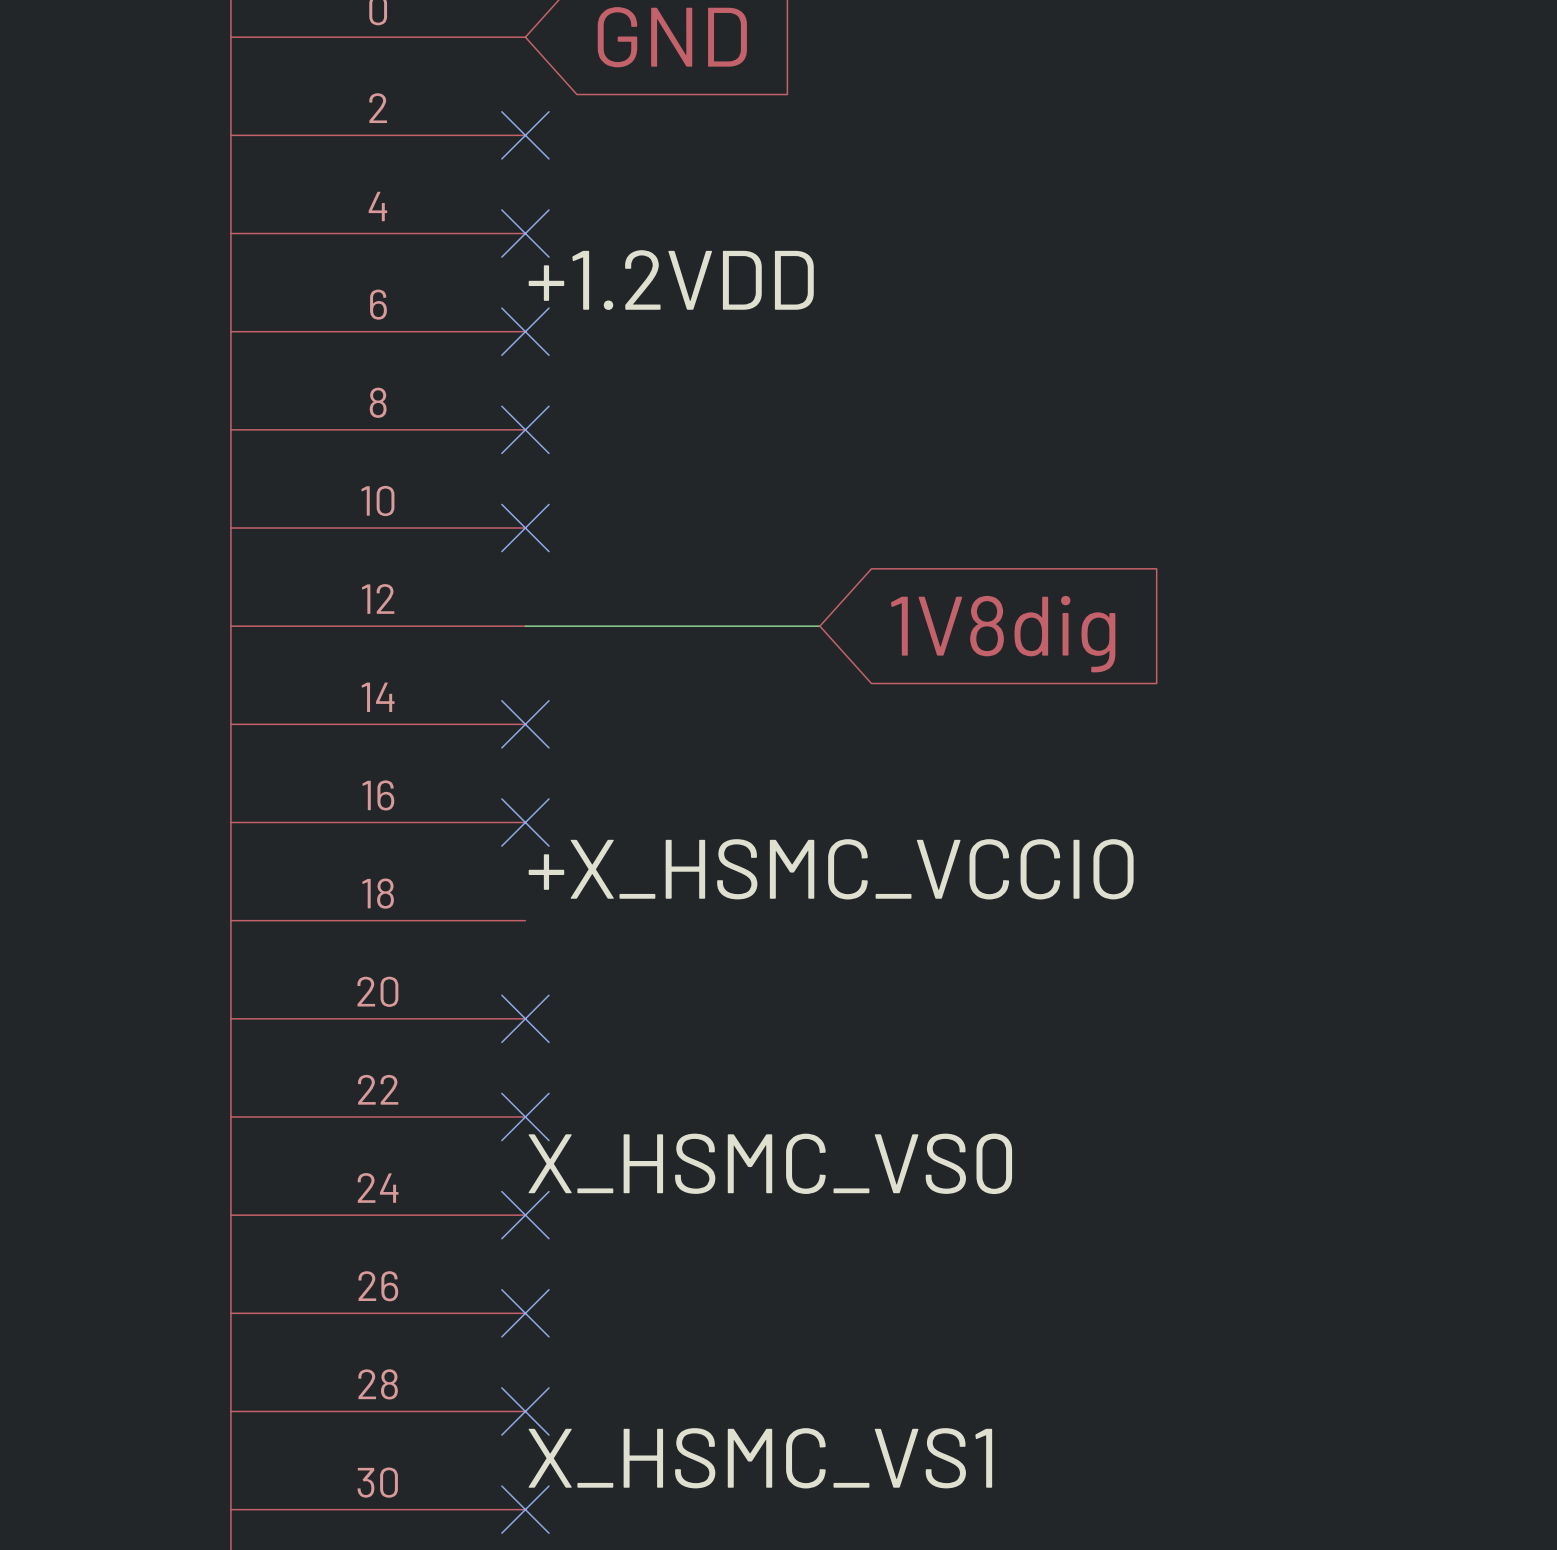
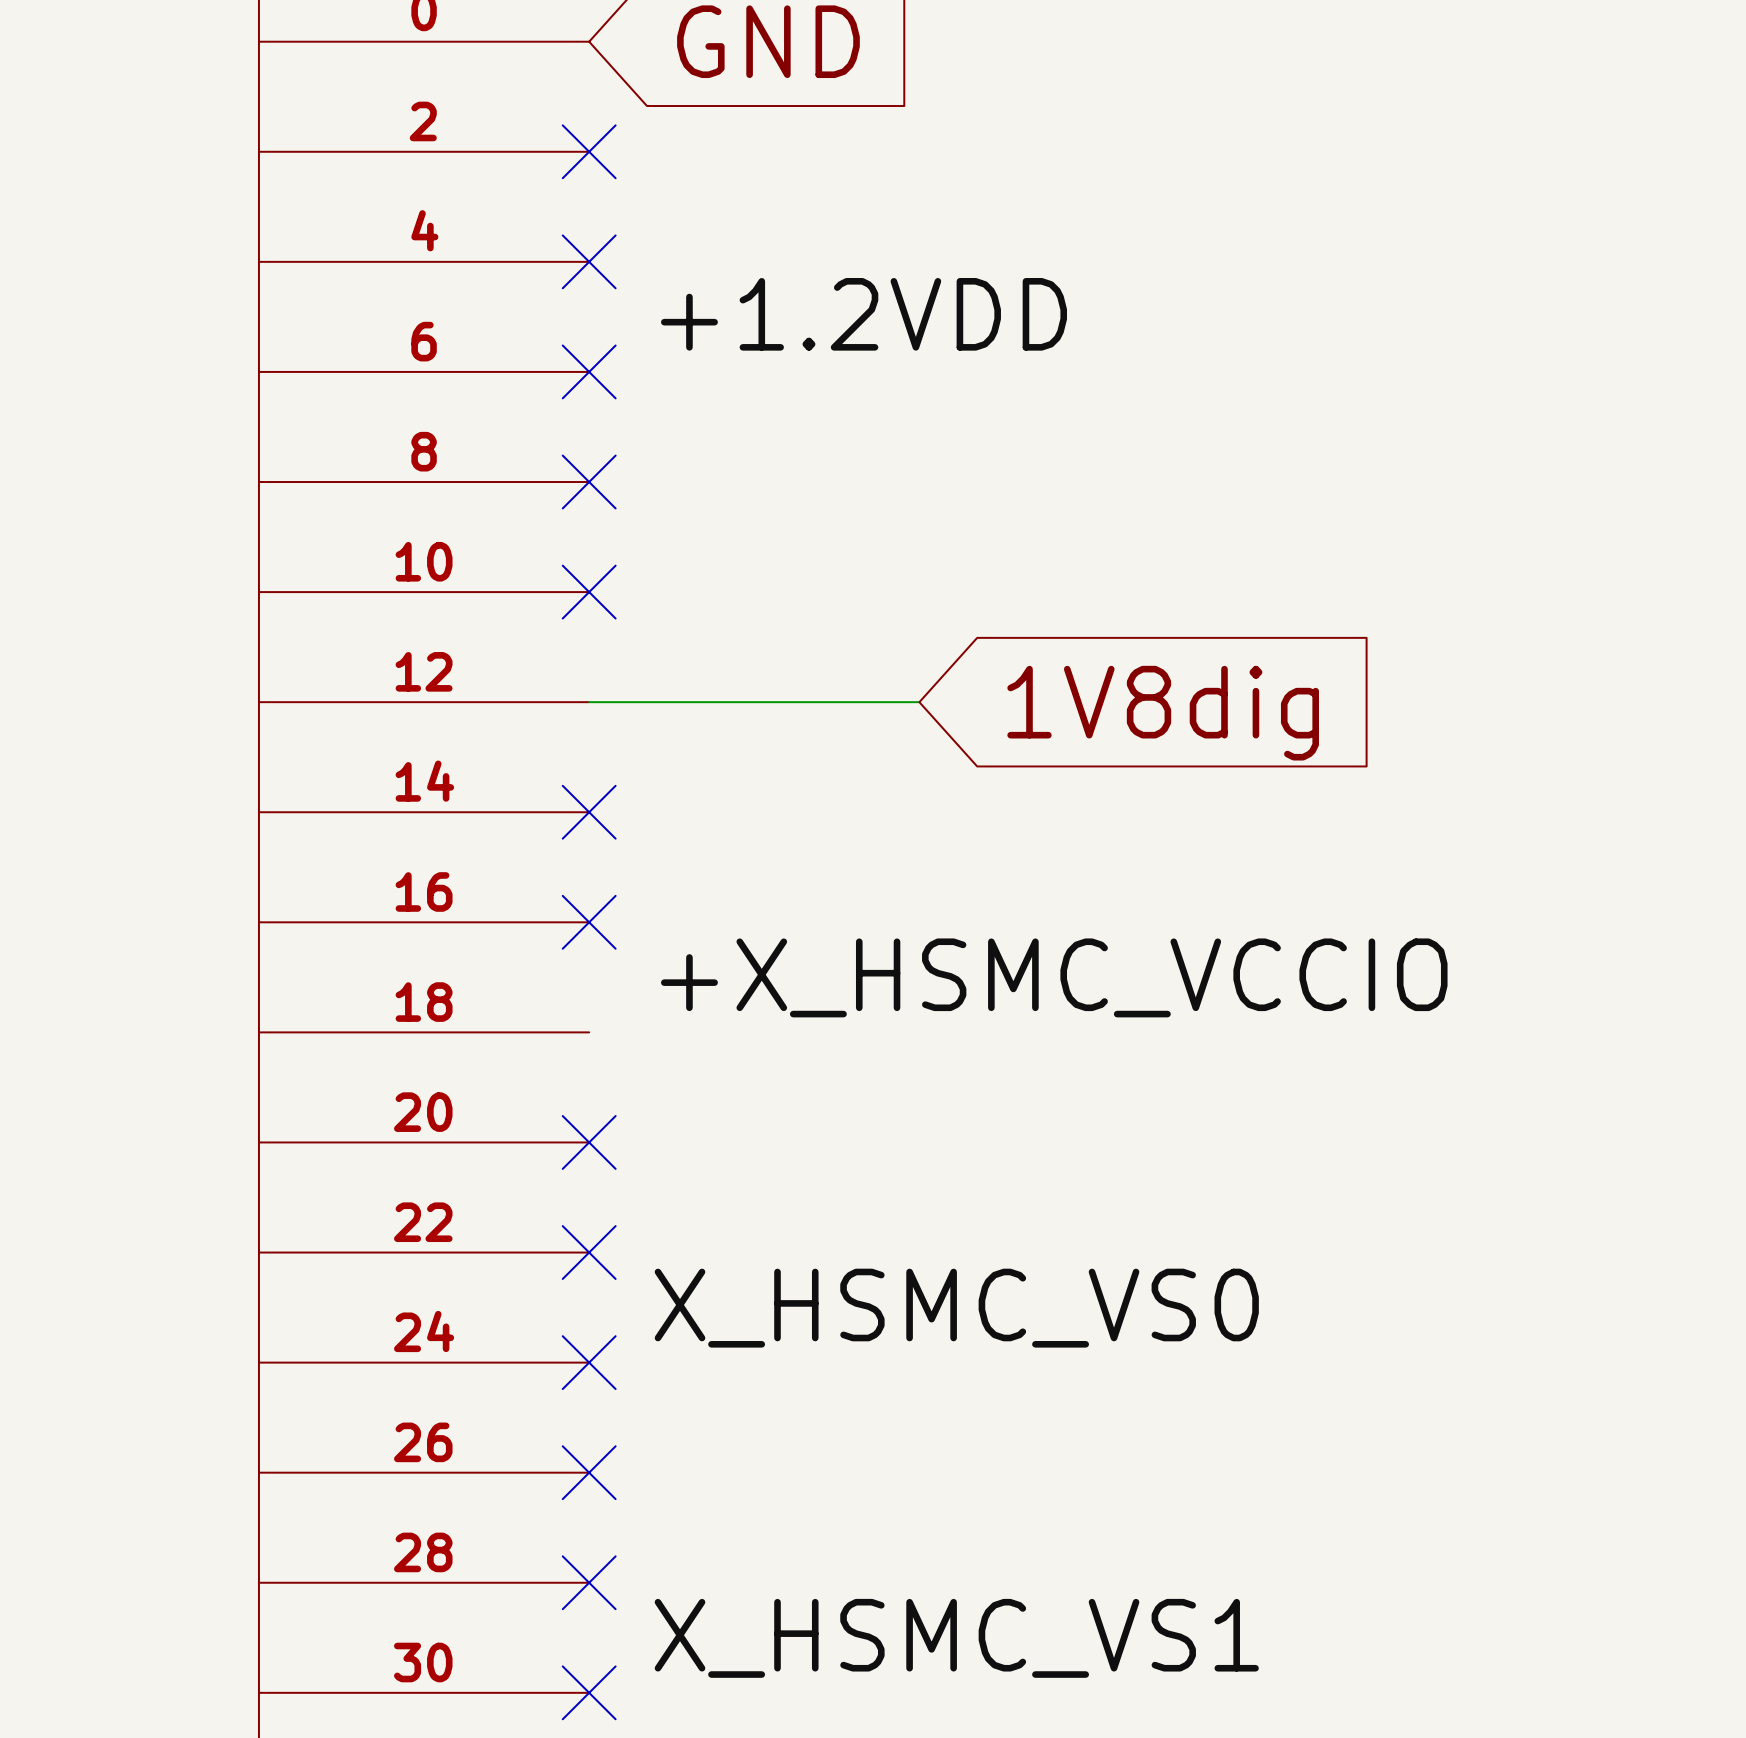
label position: +1.2VDD (671, 280) -> +1.2VDD (863, 314)
label position: +X_HSMC_VCCIO (831, 869) -> +X_HSMC_VCCIO (1054, 977)
label position: X_HSMC_VS0 (770, 1163) -> X_HSMC_VS0 (956, 1308)
label position: X_HSMC_VS1 (760, 1458) -> X_HSMC_VS1 (956, 1638)

